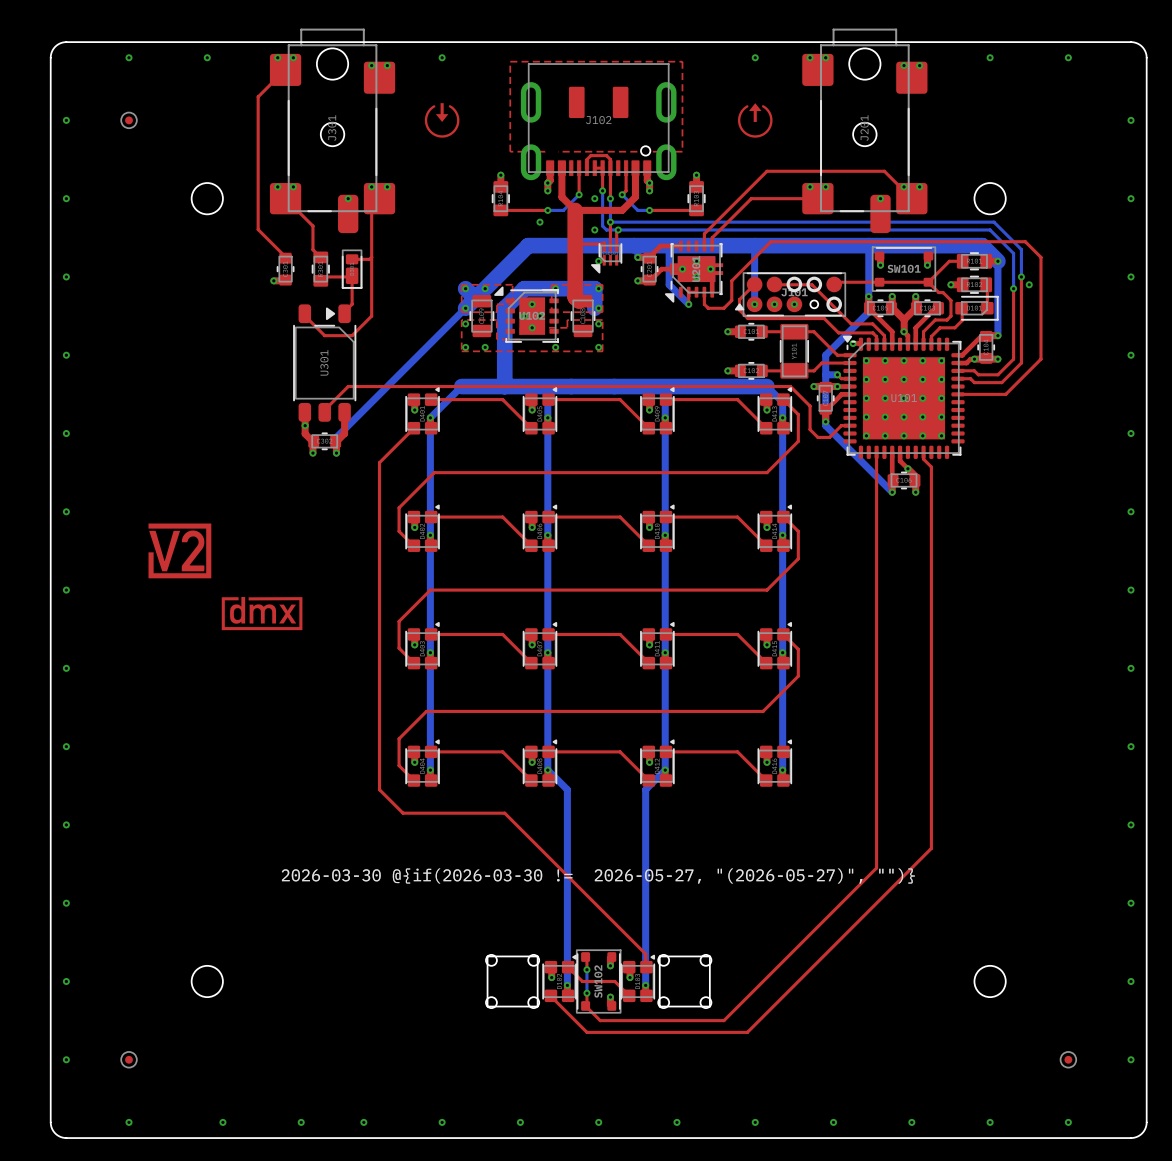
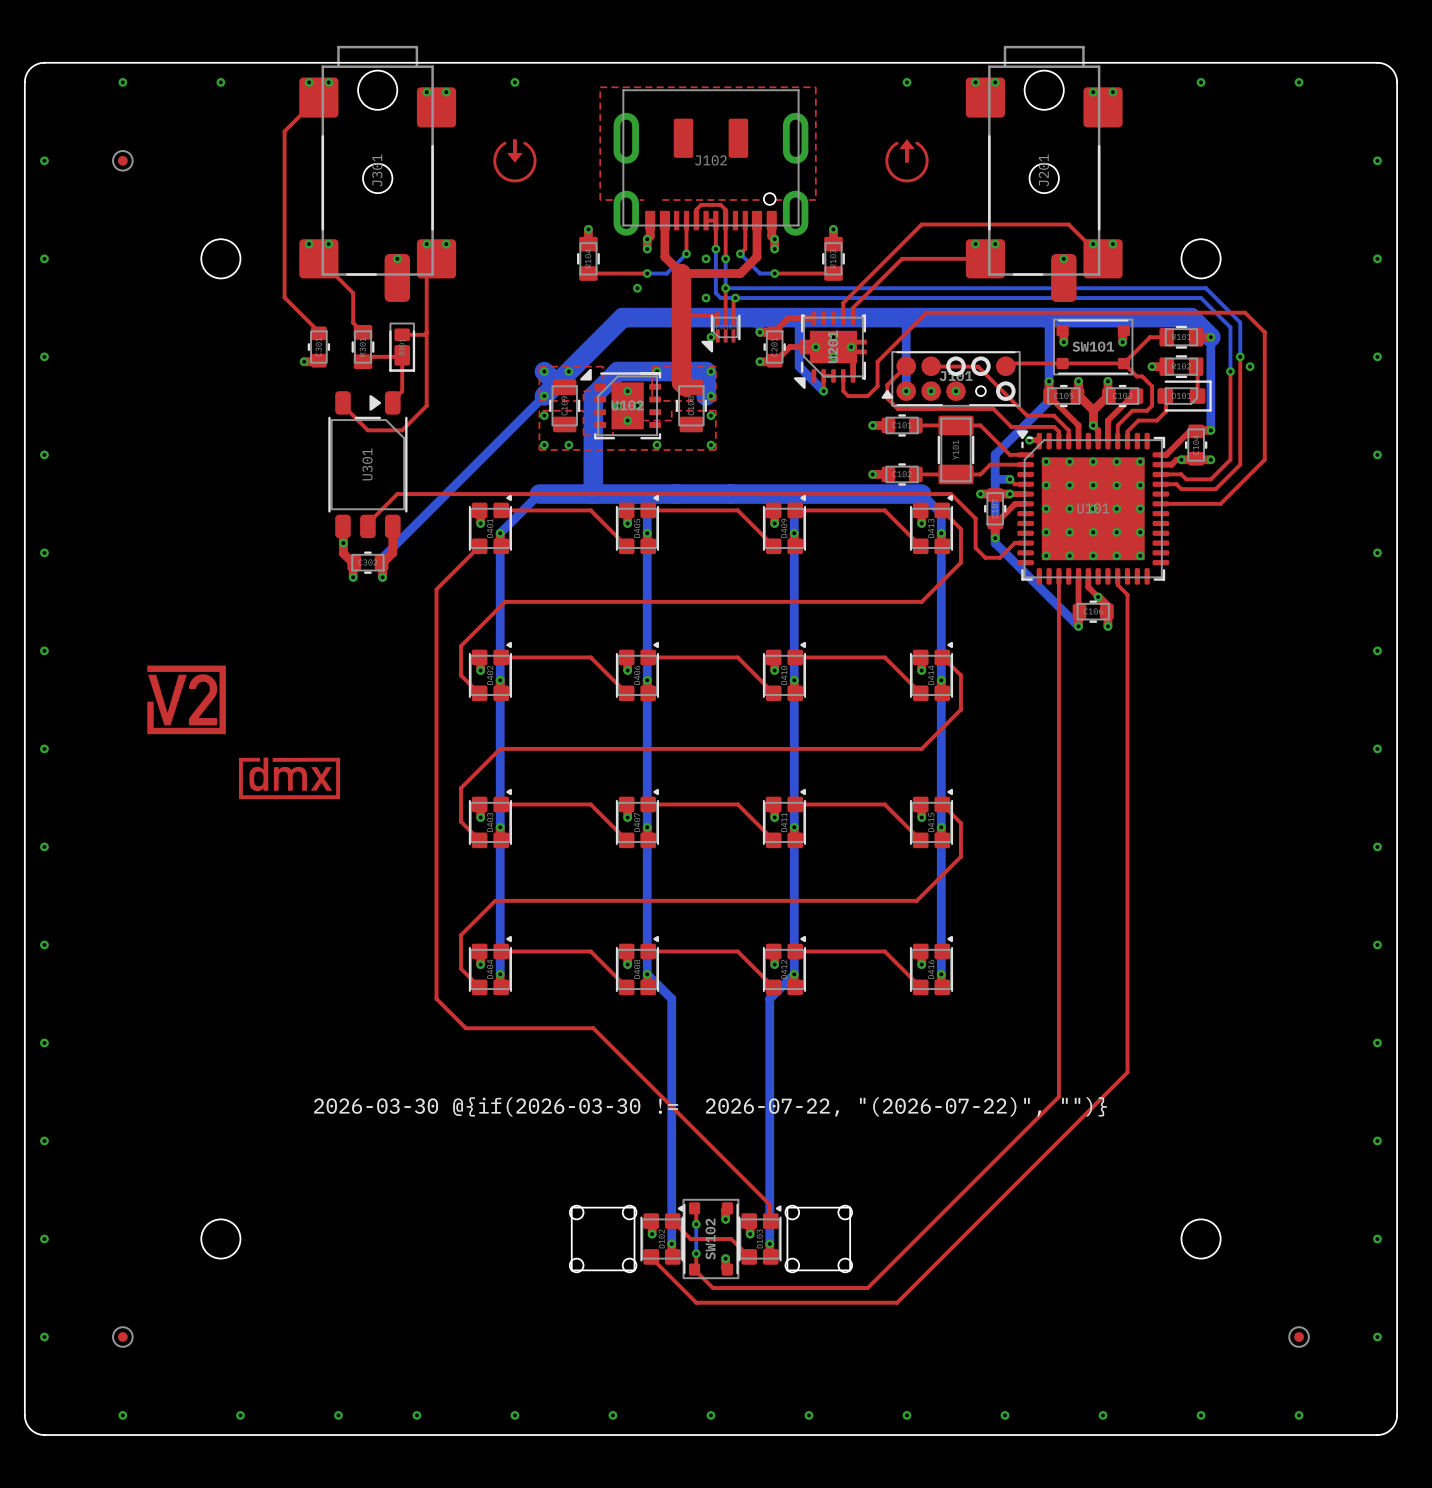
drawing shape: [281, 868, 915, 884] -> [314, 1097, 1107, 1117]

